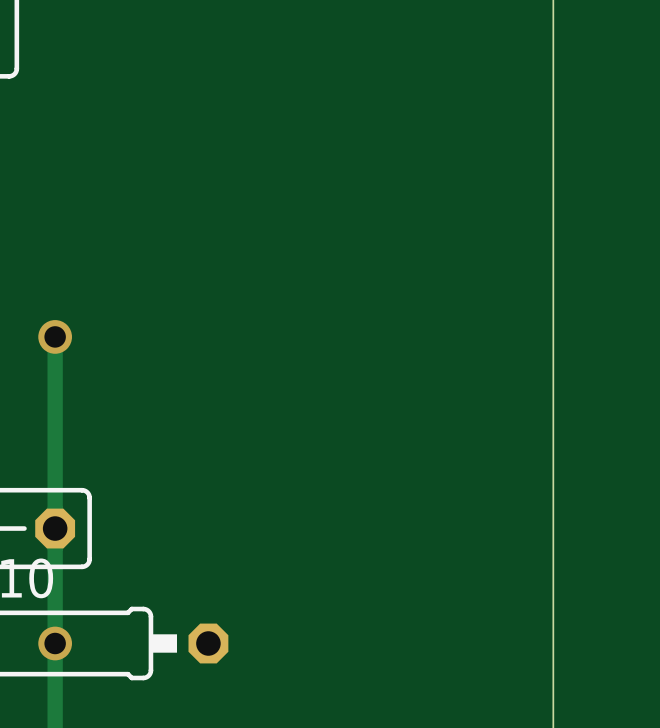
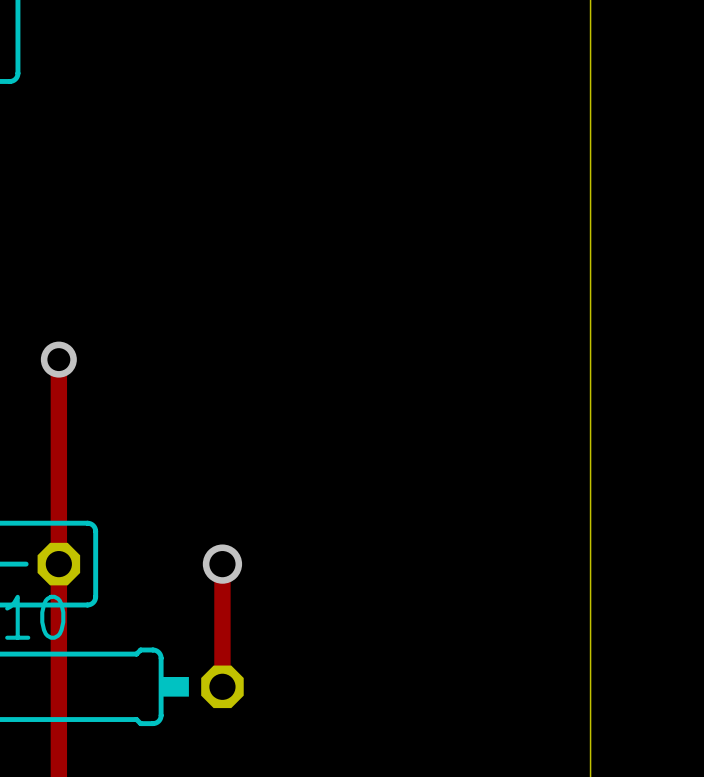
track: none -> (222, 564) (222, 686)
via: none -> (222, 564)
via: (55, 643) -> none

